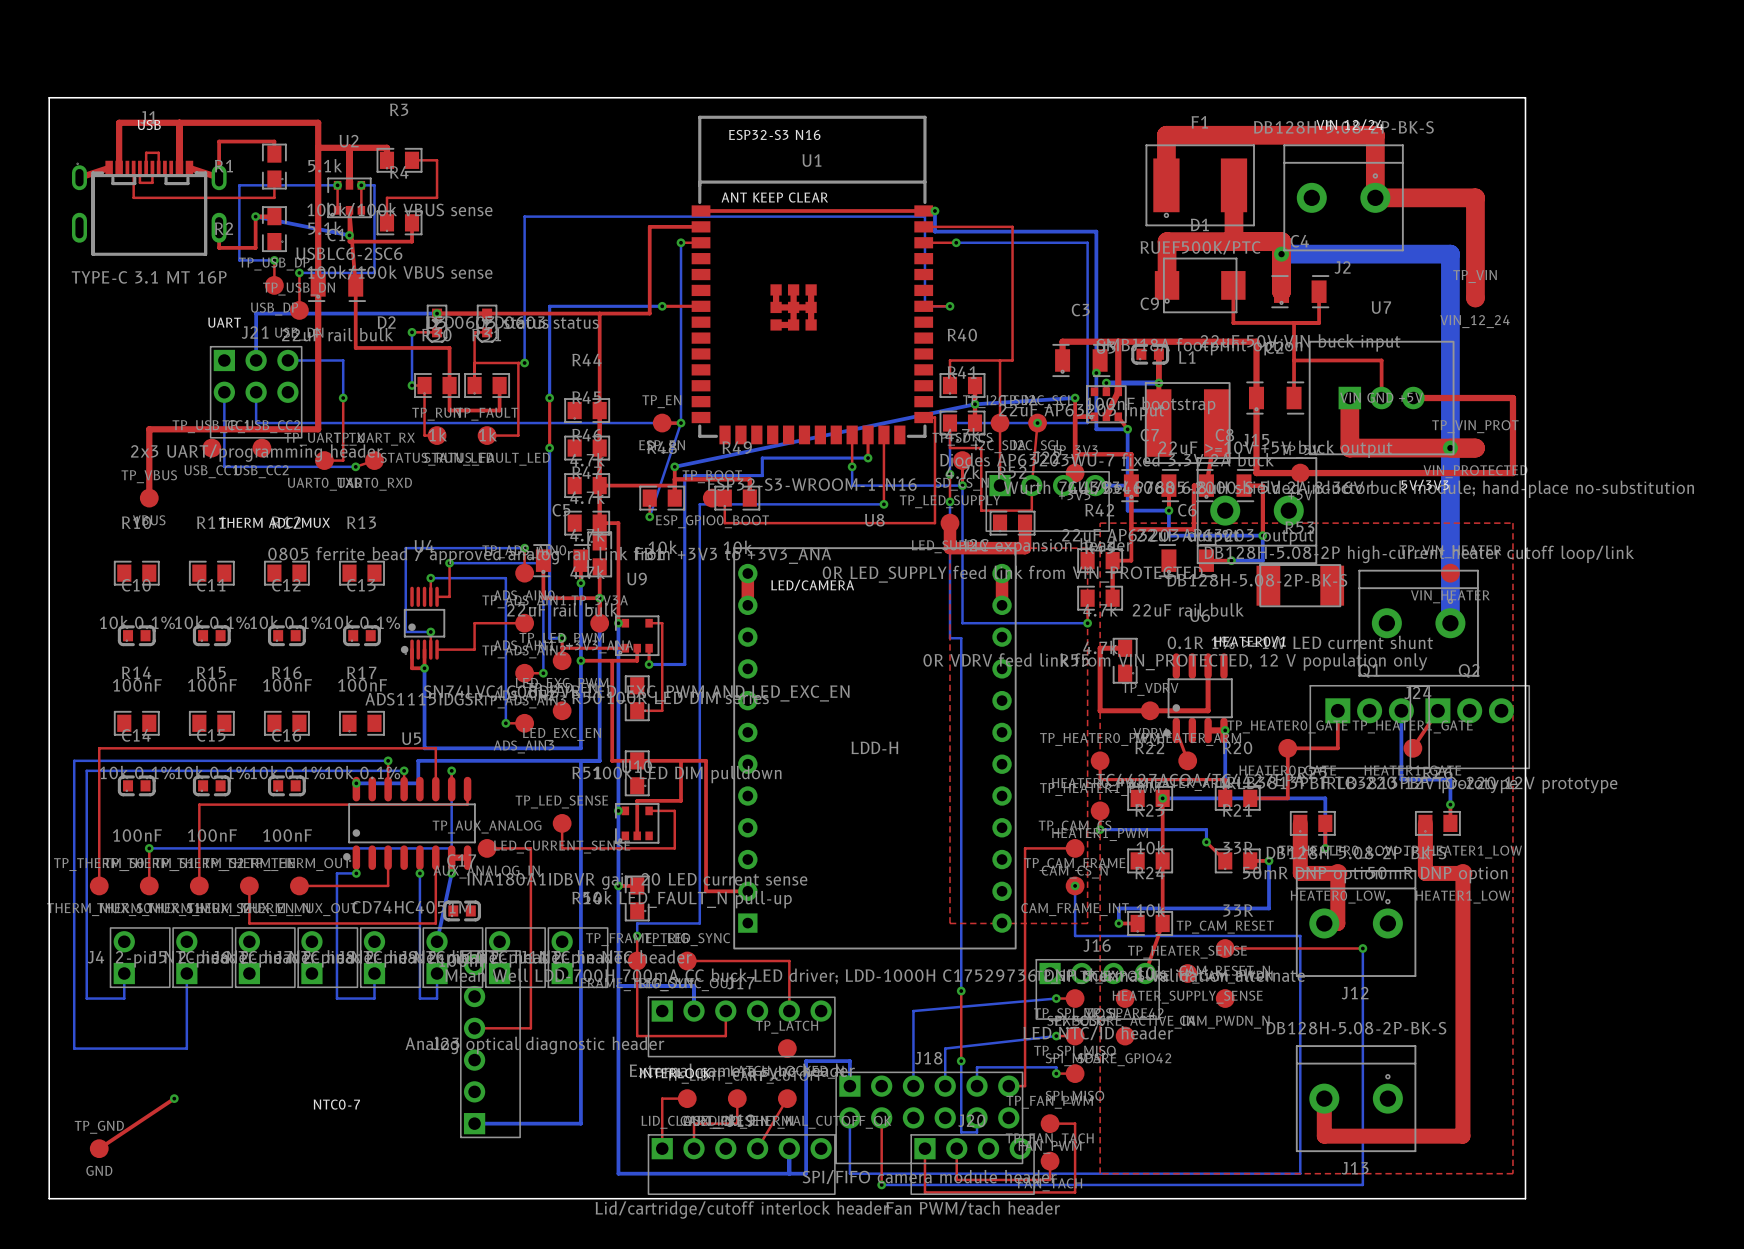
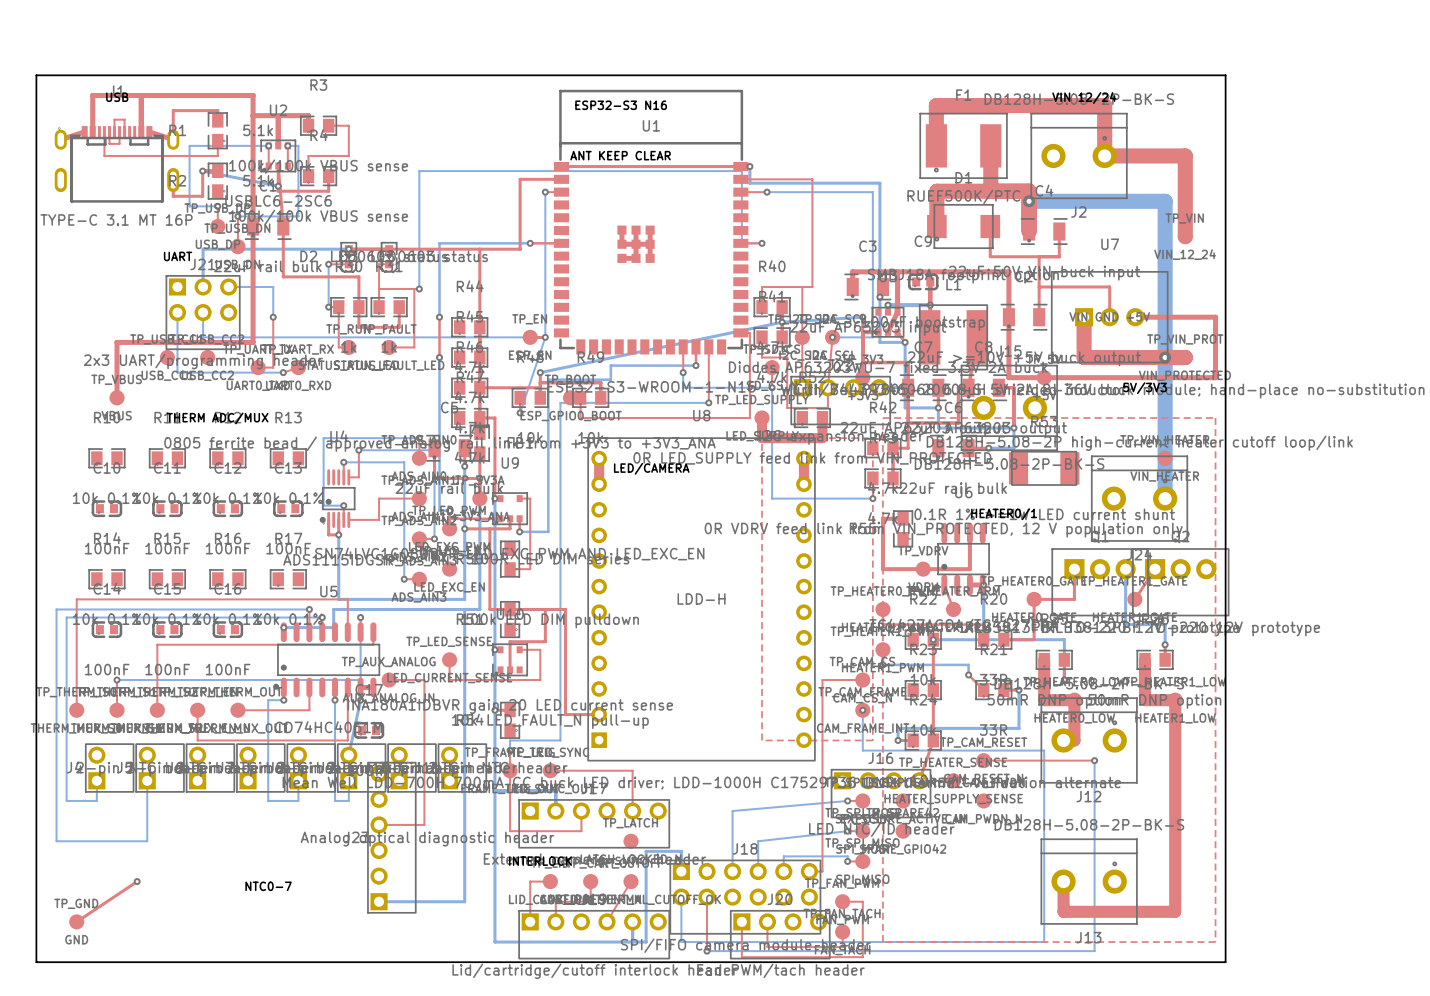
bottom track: (1037, 423) (949, 423) (949, 474) -> none
top track: (949, 474) (949, 501) -> none
via: (949, 474) -> none
bottom track: (949, 501) (949, 638) (961, 638) (961, 991) -> none
via: (949, 501) -> none
top track: (961, 991) (961, 1061) -> none
via: (961, 991) -> none
bottom track: (961, 1061) (961, 1132) (977, 1132) (977, 1117) -> none
via: (961, 1061) -> none

